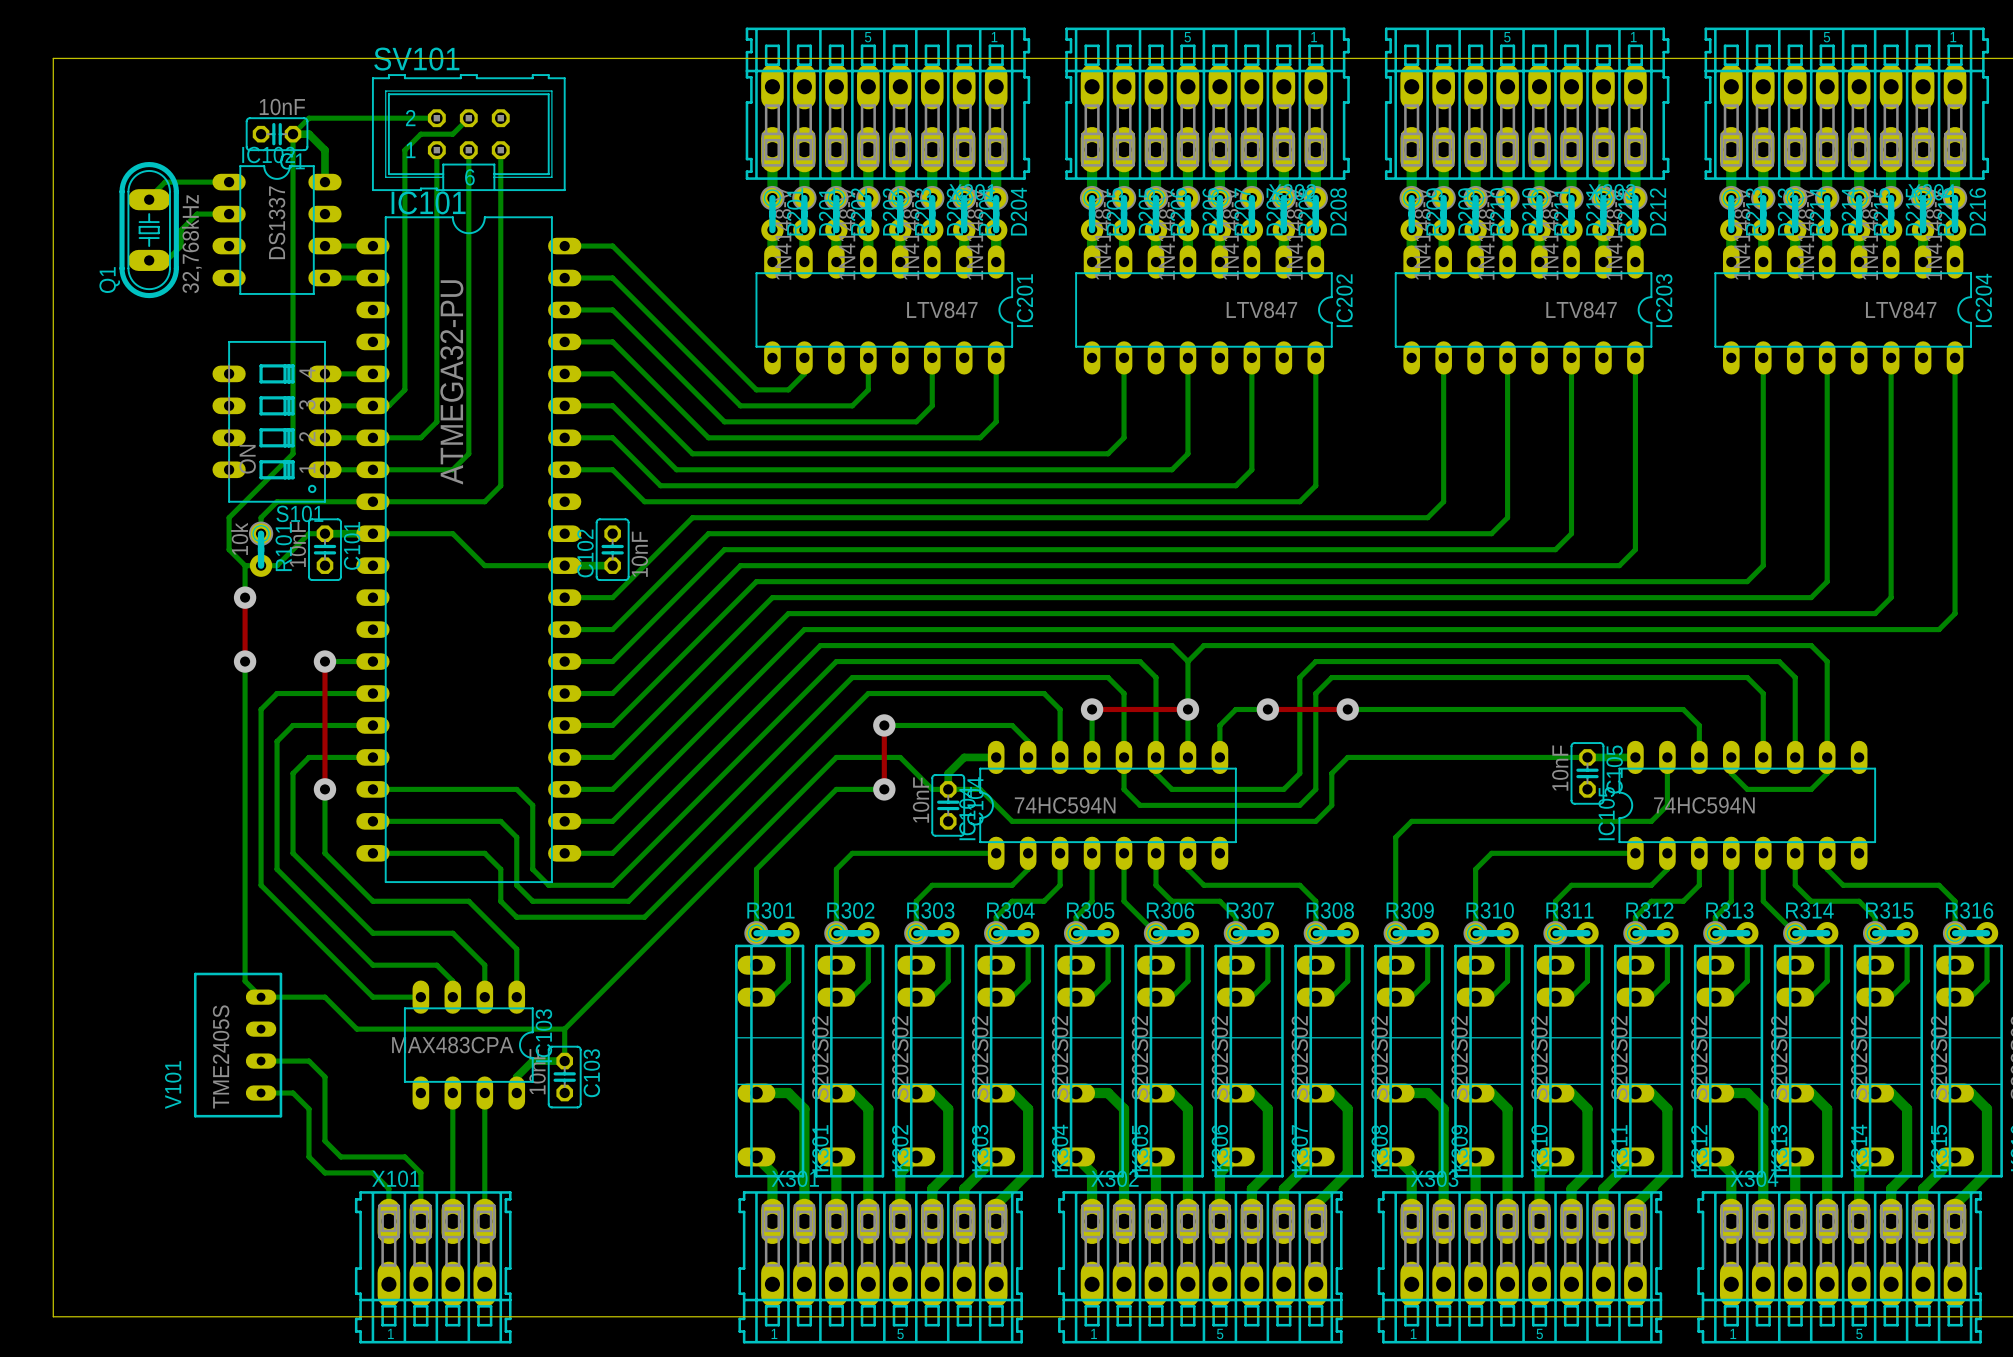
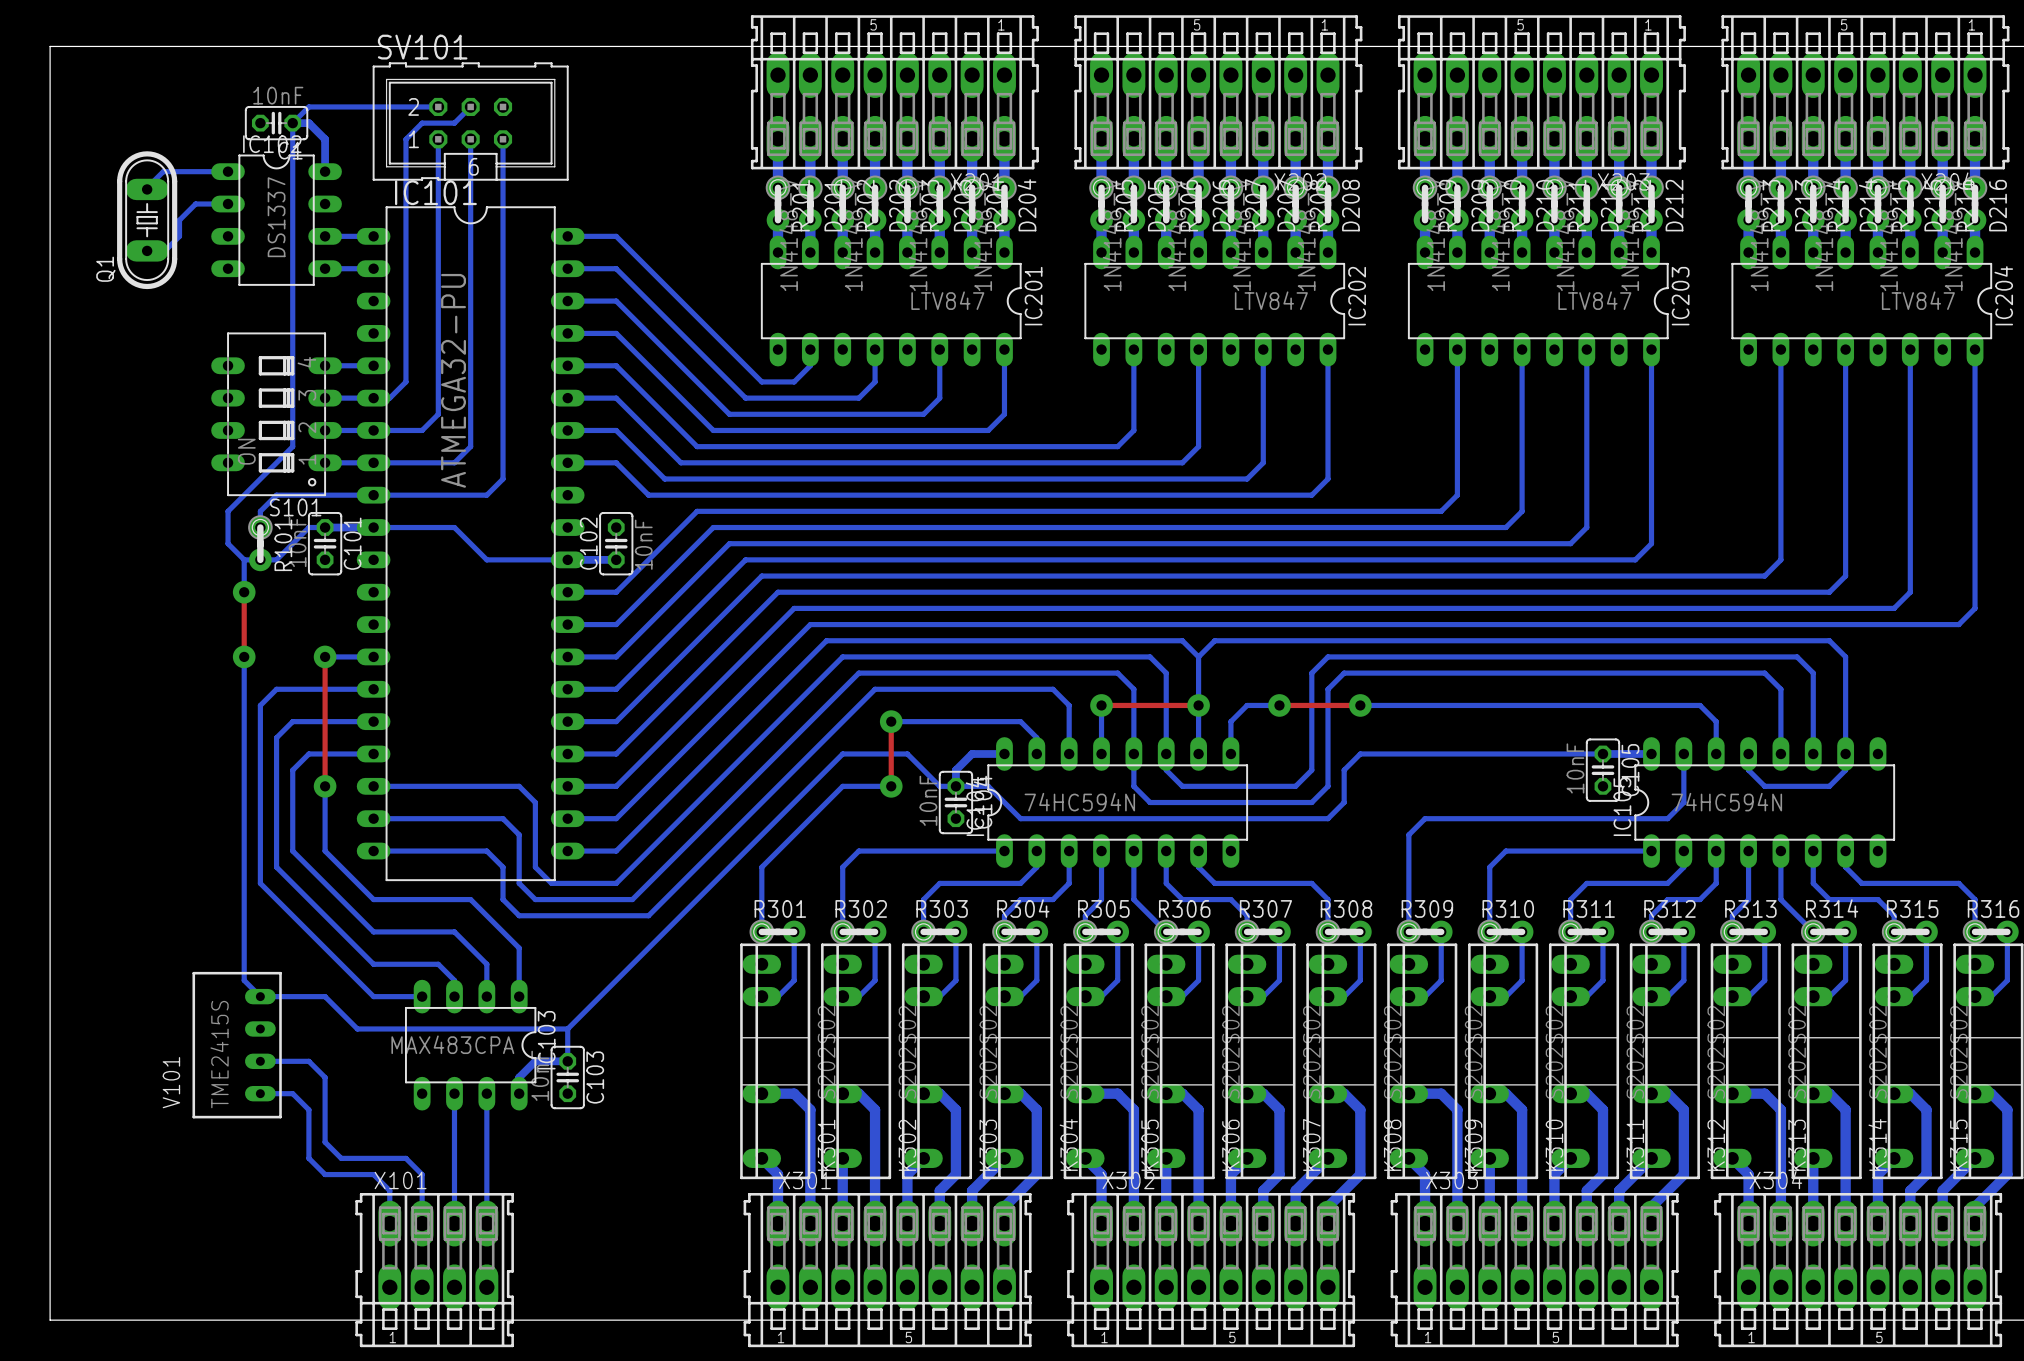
Q1 value: 32,768kHz (191, 244) -> none
R101 value: 10k (239, 538) -> none
V101 value: TME2405S (221, 1056) -> TME2415S (219, 1054)

